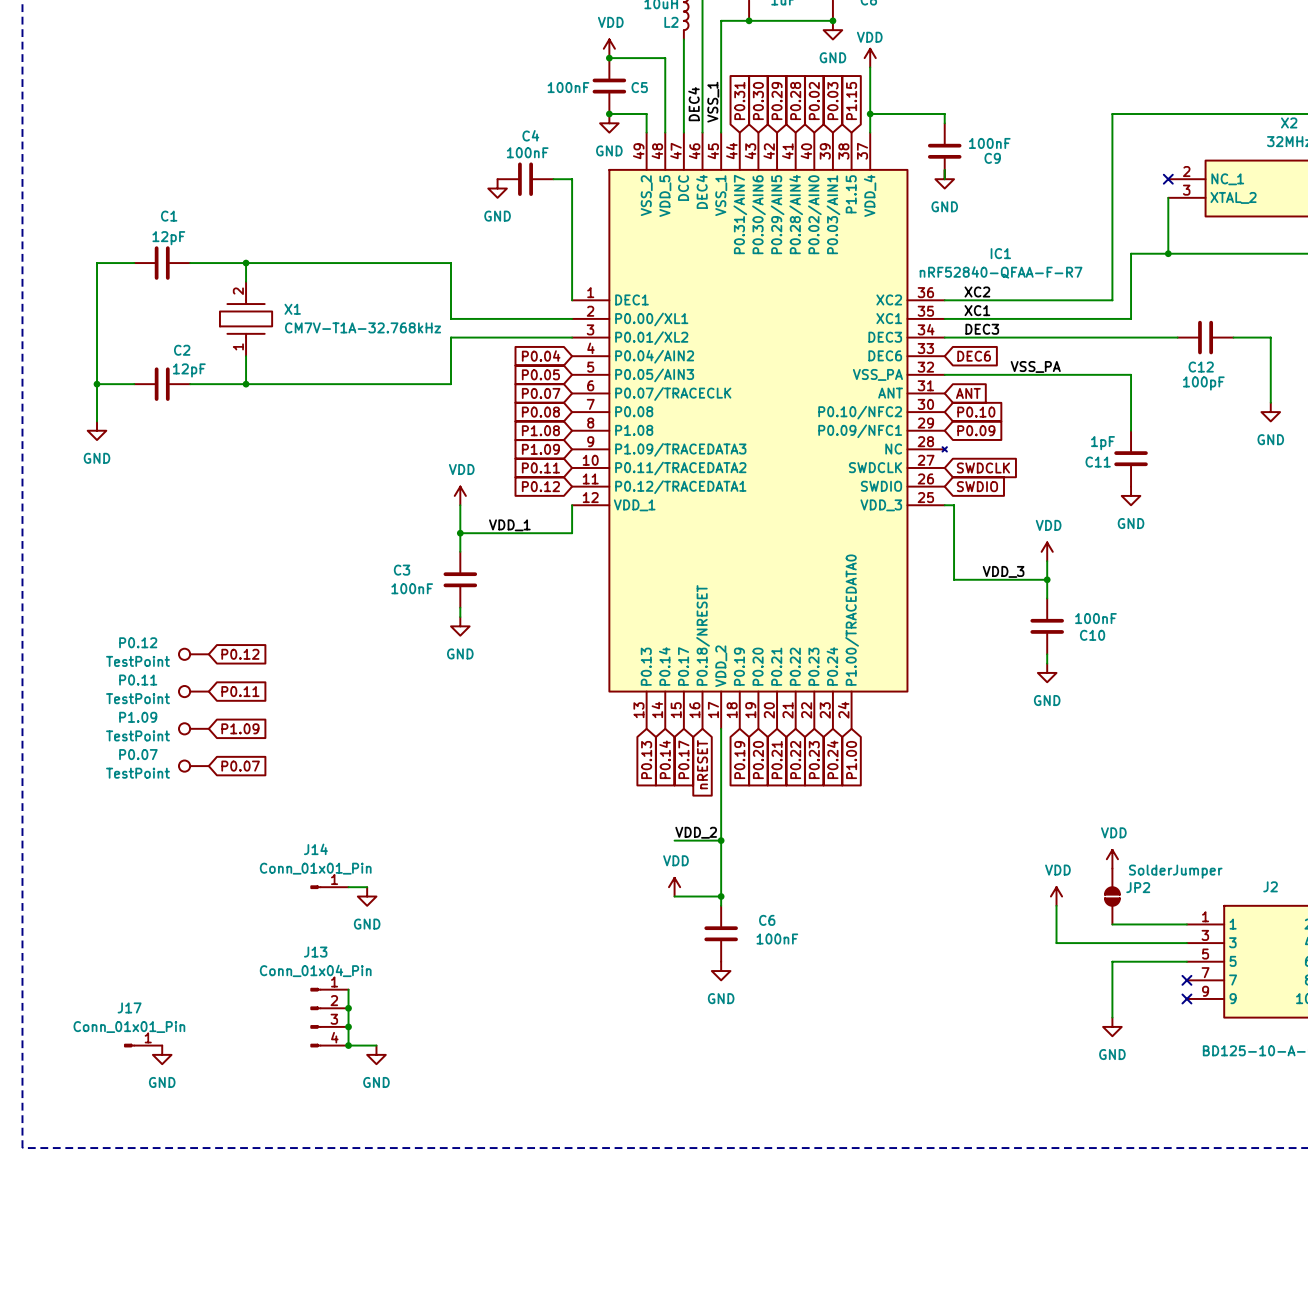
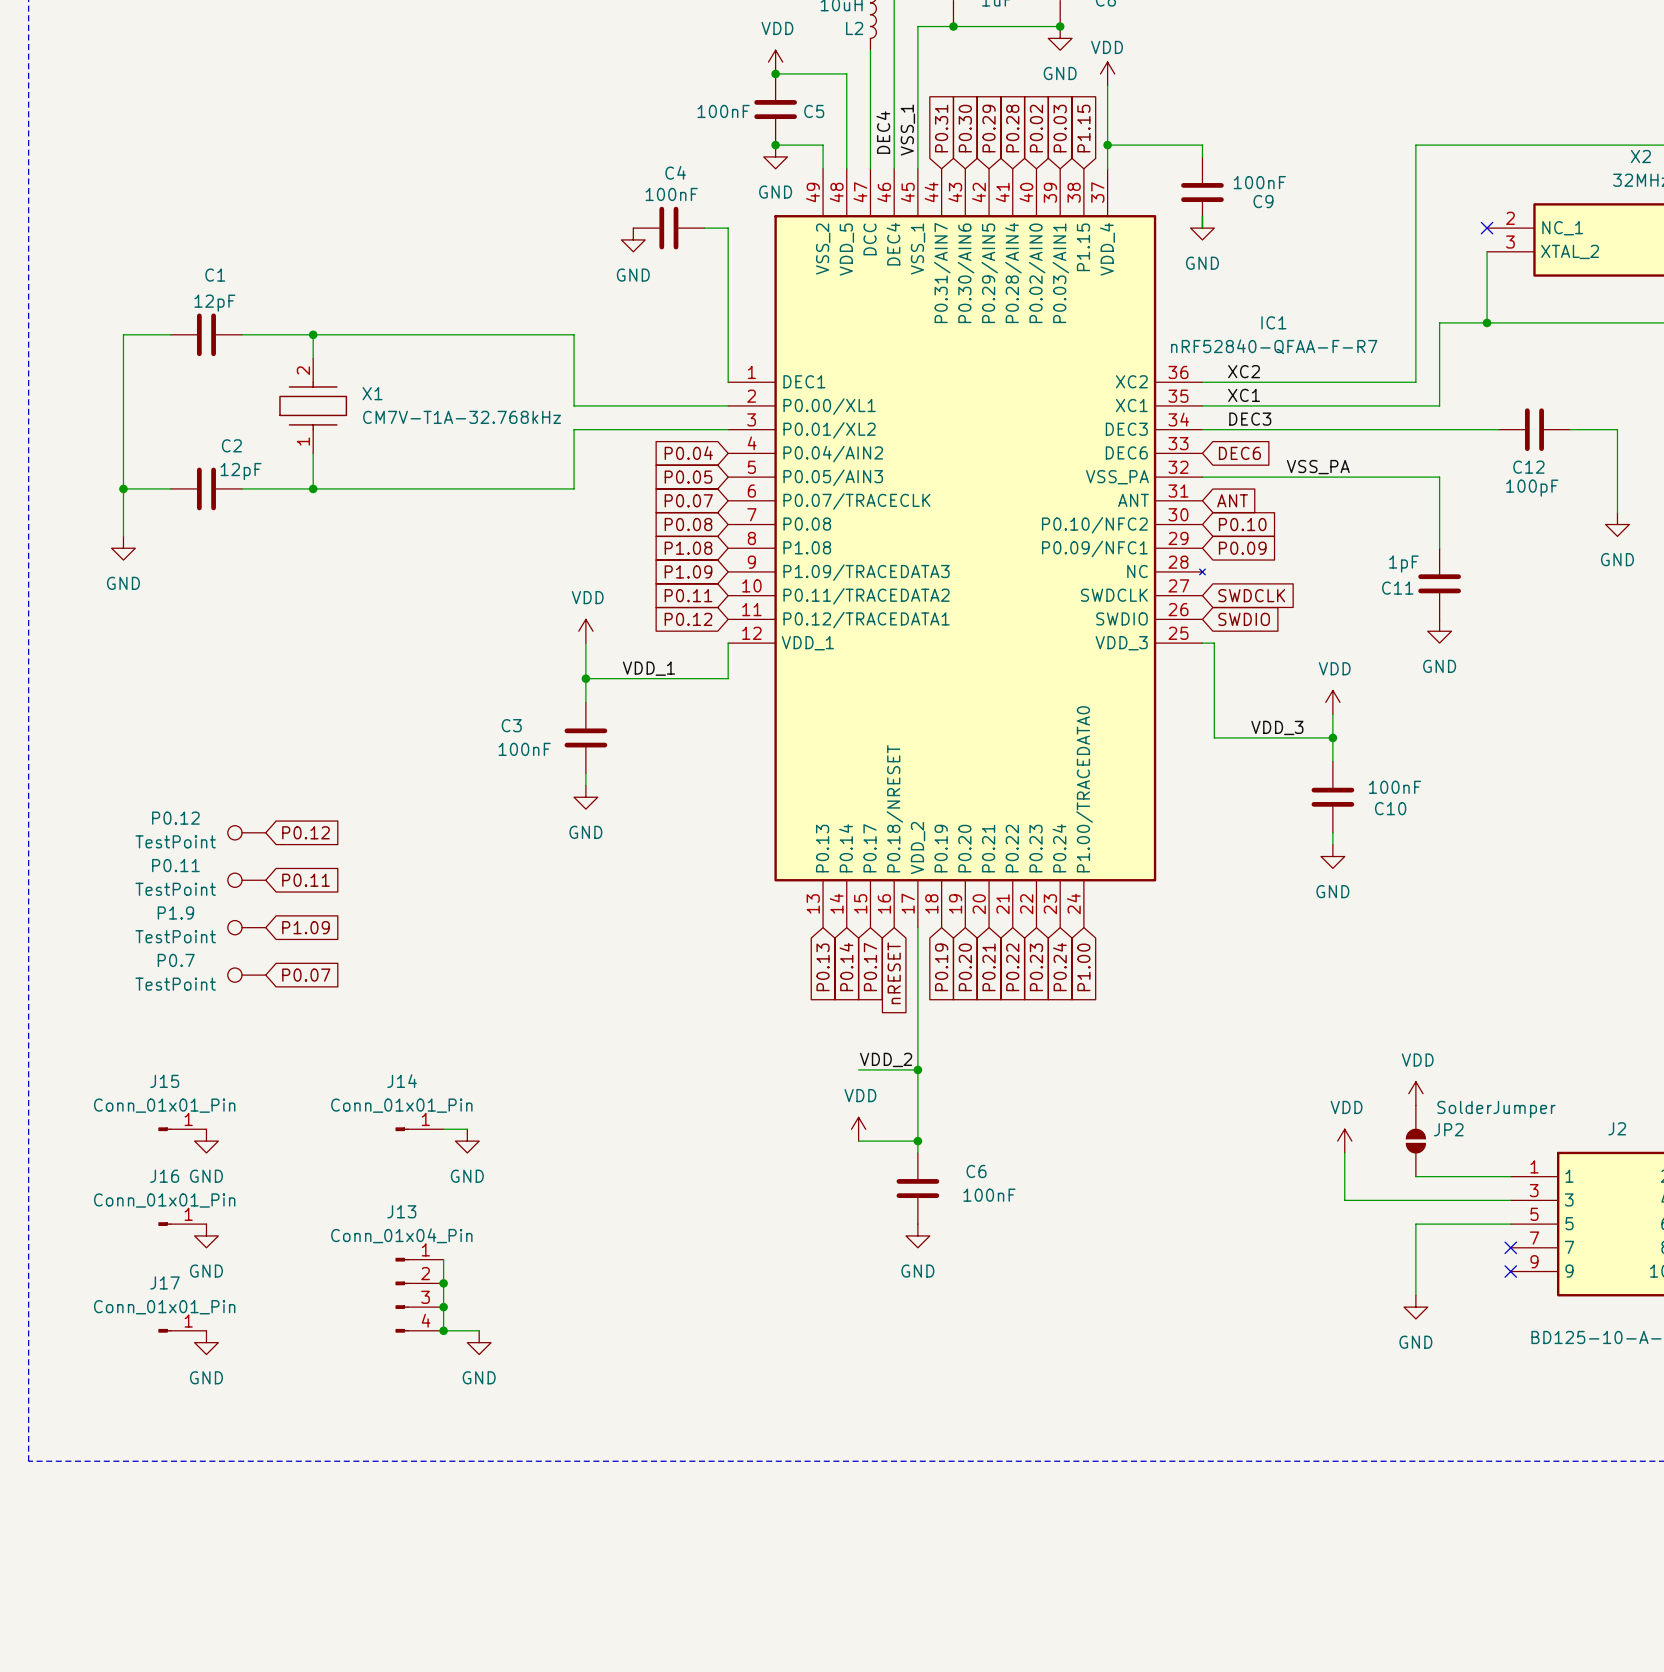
P1.09 name: P1.09 (138, 717) -> P1.9 (175, 913)
P0.07 name: P0.07 (138, 754) -> P0.7 (176, 960)
J15: none -> Conn_01x01_Pin (182, 1129)
power symbol: none -> GND (206, 1141)
J16: none -> Conn_01x01_Pin (182, 1224)
power symbol: none -> GND (206, 1235)

